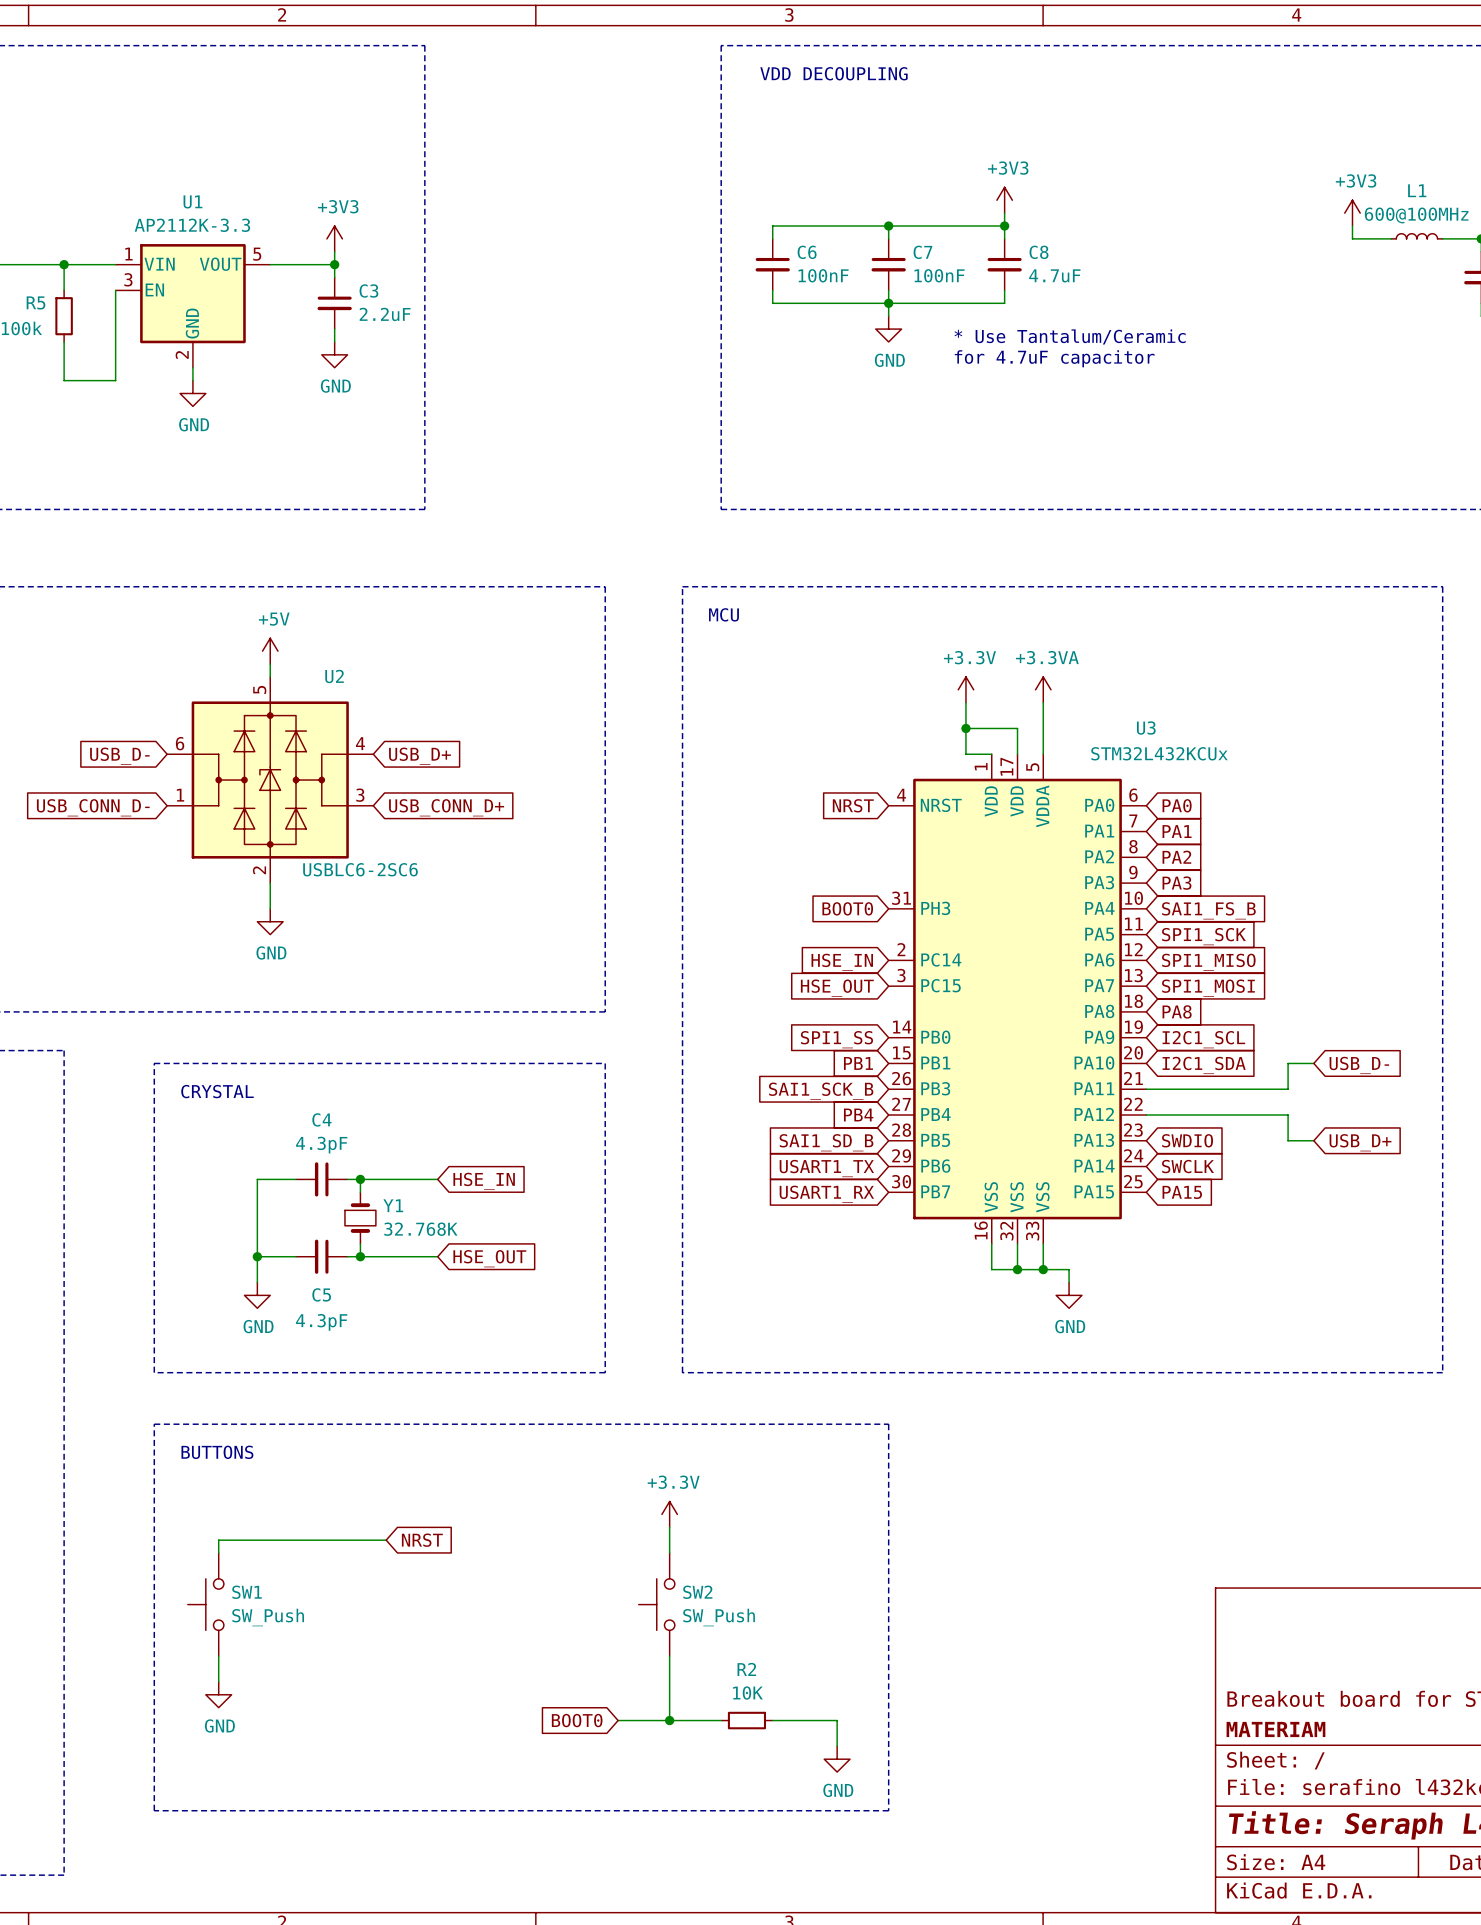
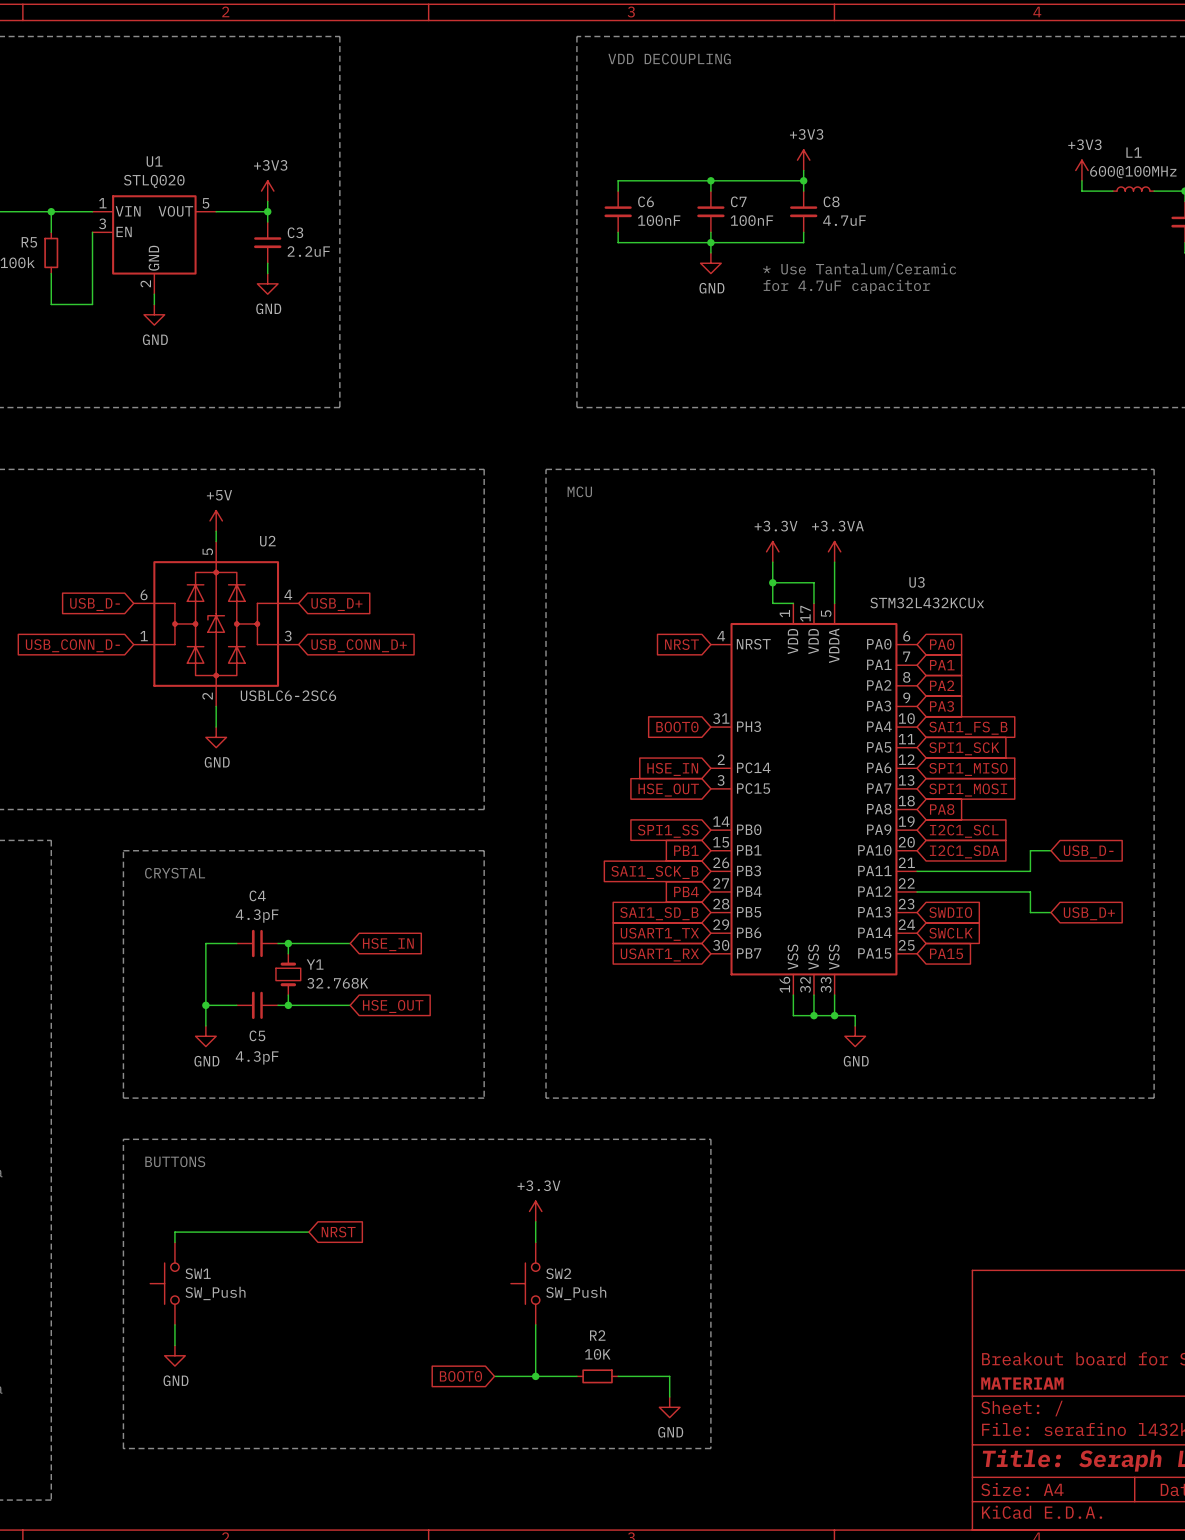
U1 value: AP2112K-3.3 (192, 225) -> STLQ020 (154, 181)

